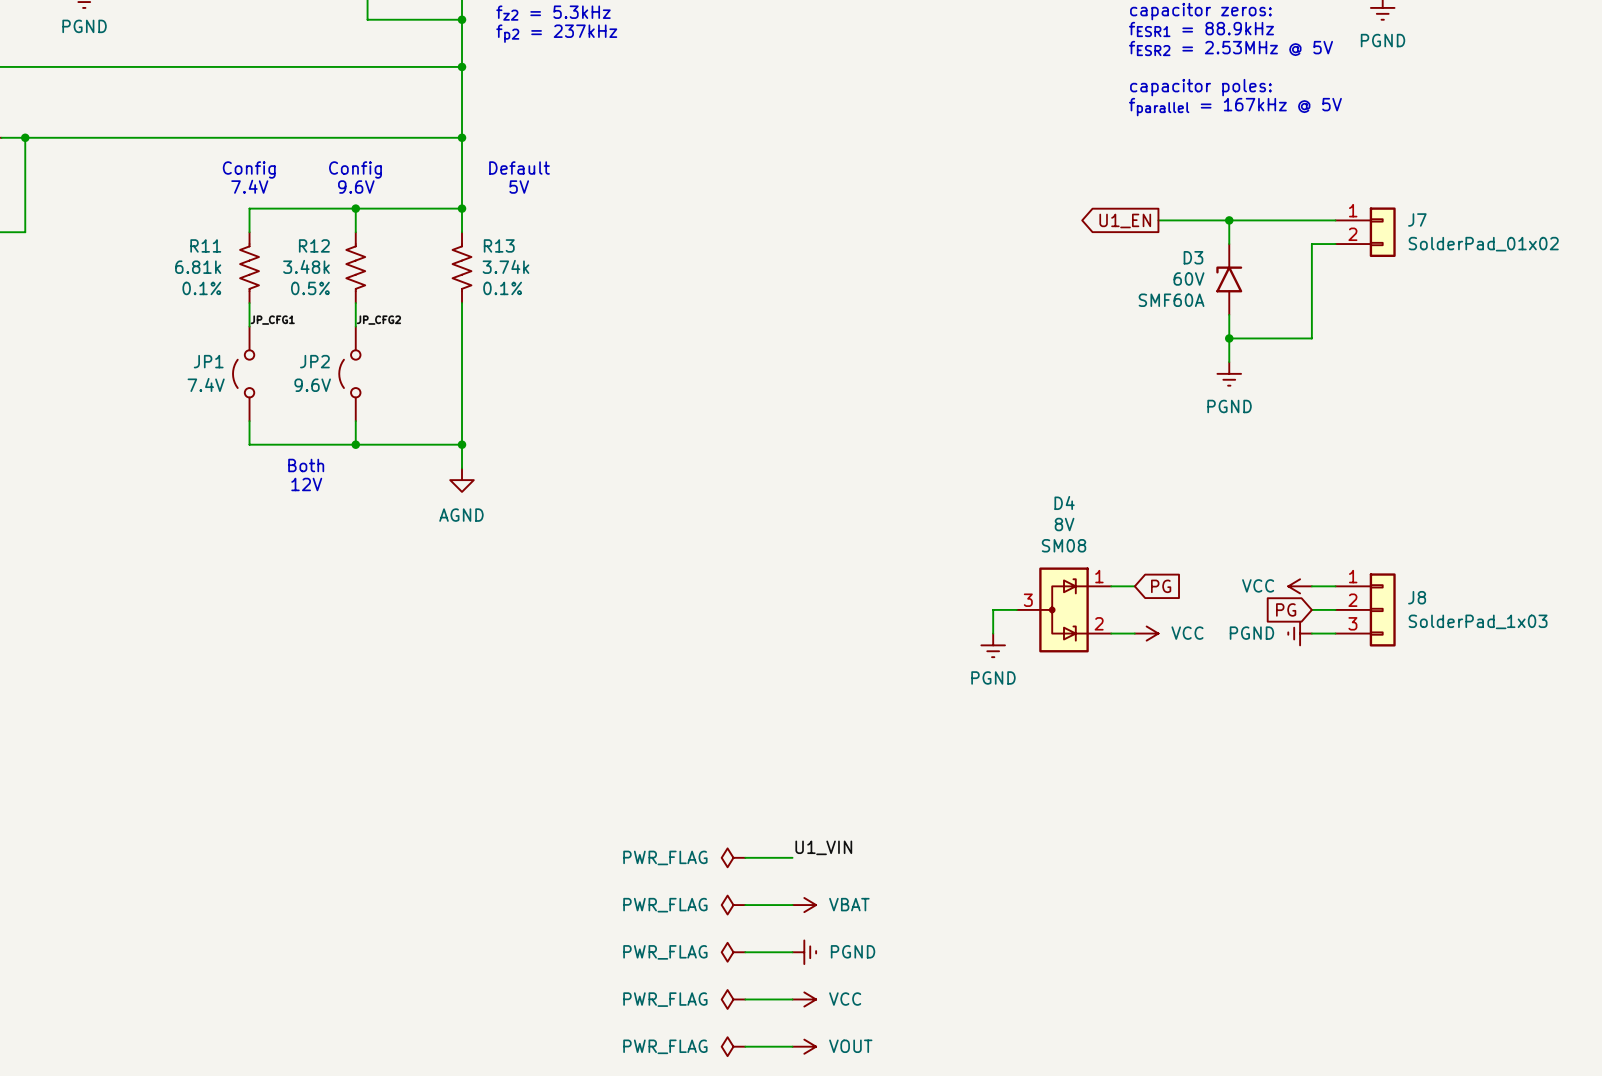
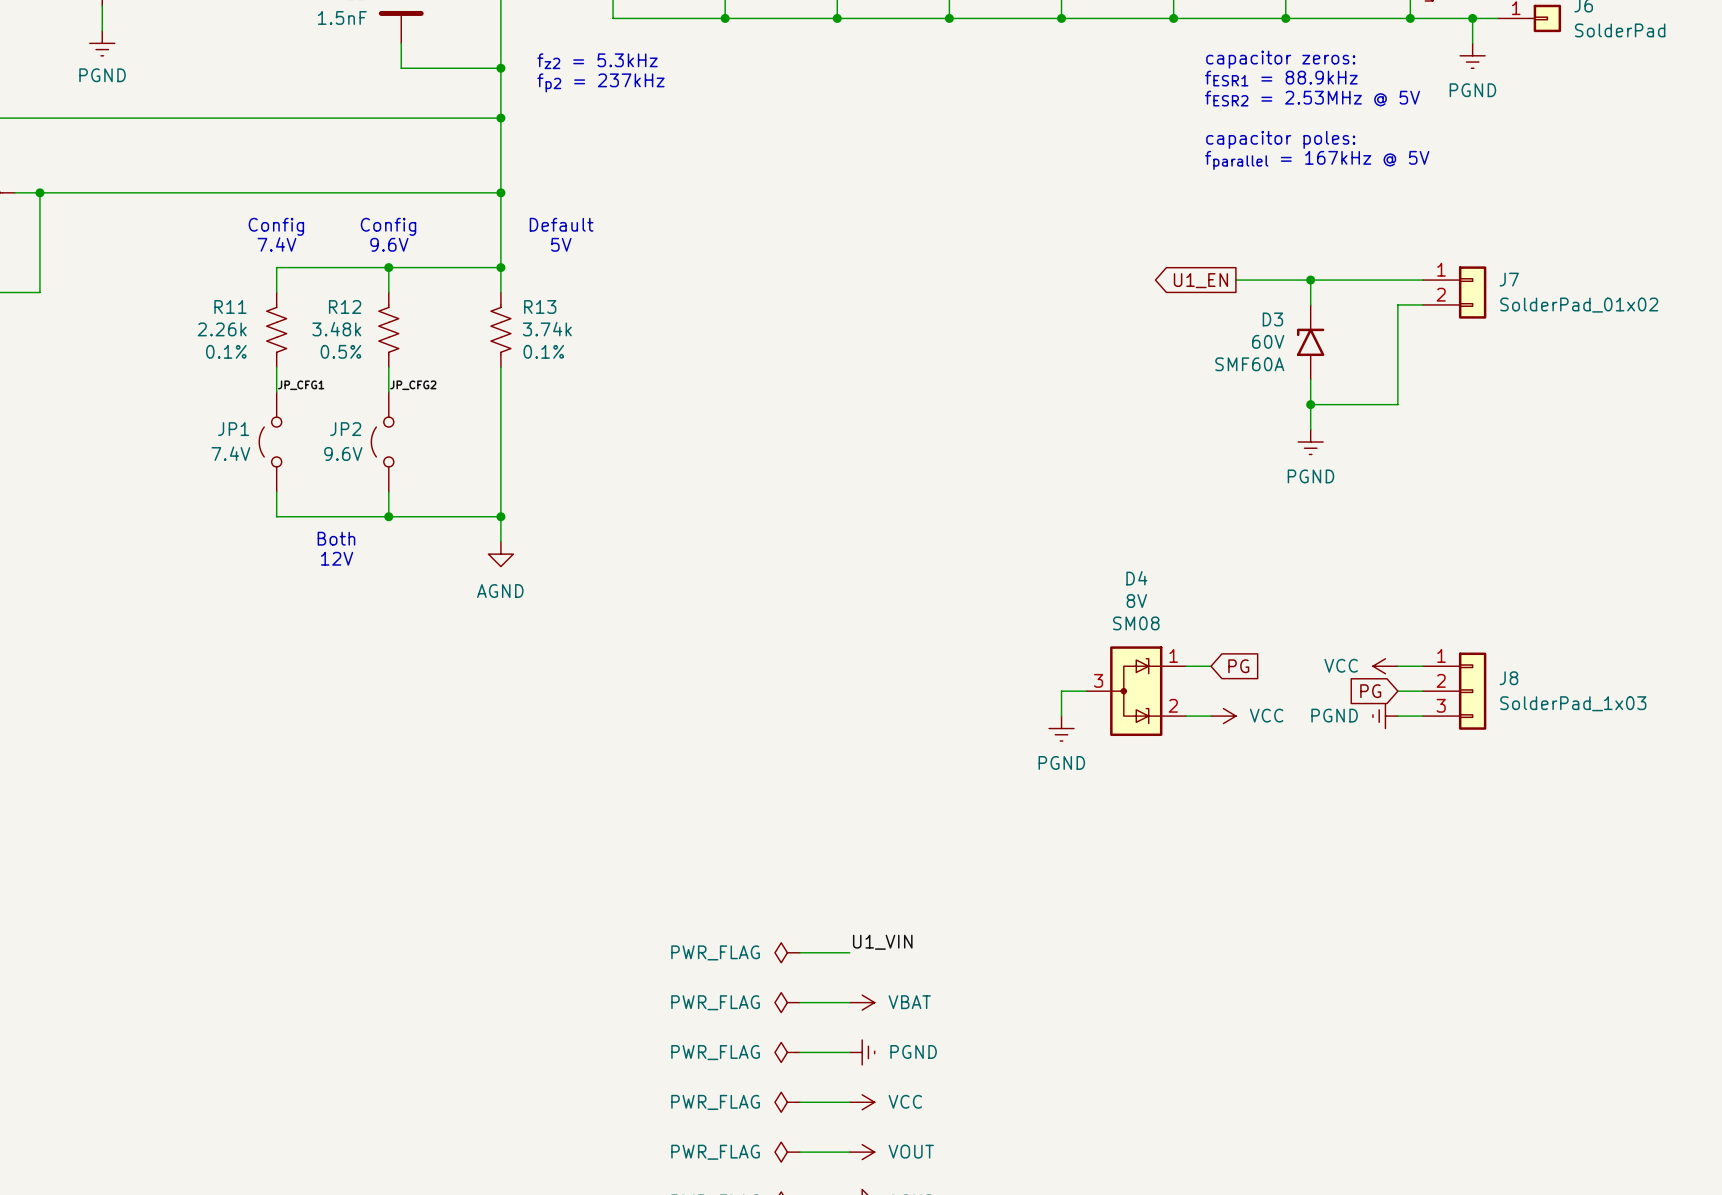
R11 value: 6.81k (198, 267) -> 2.26k (222, 329)

